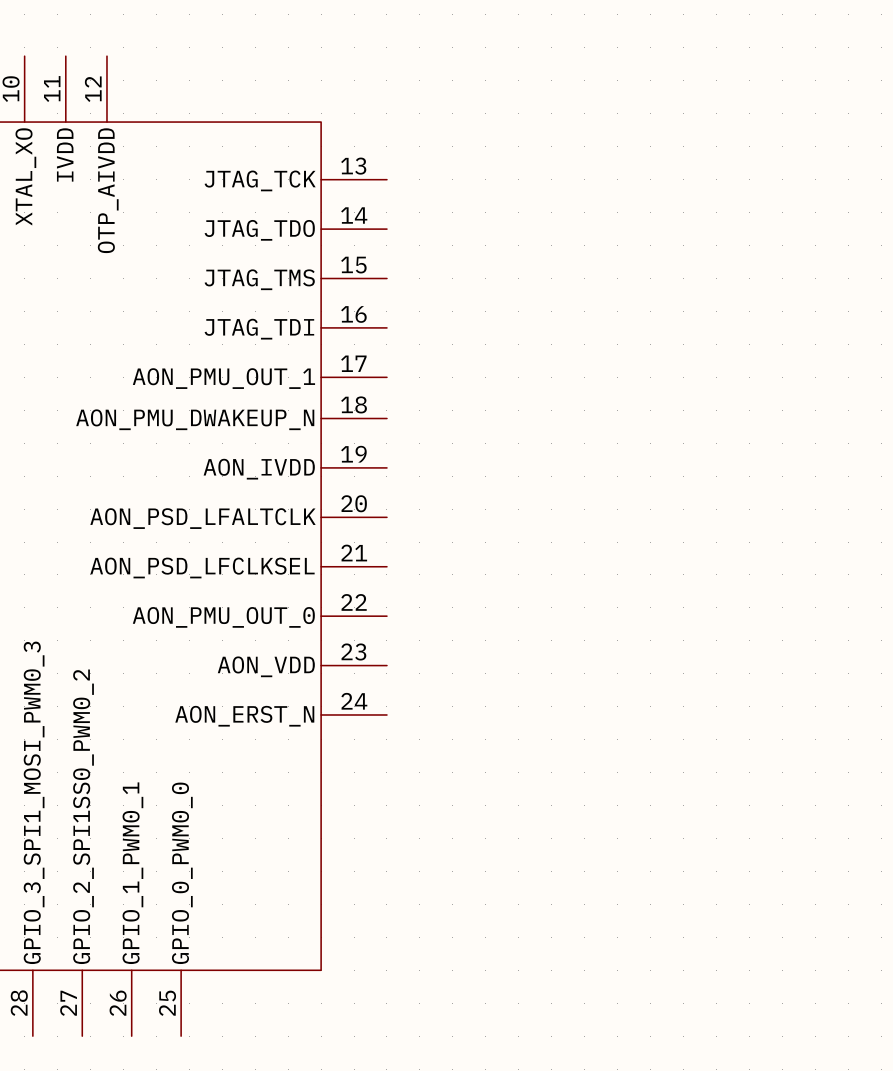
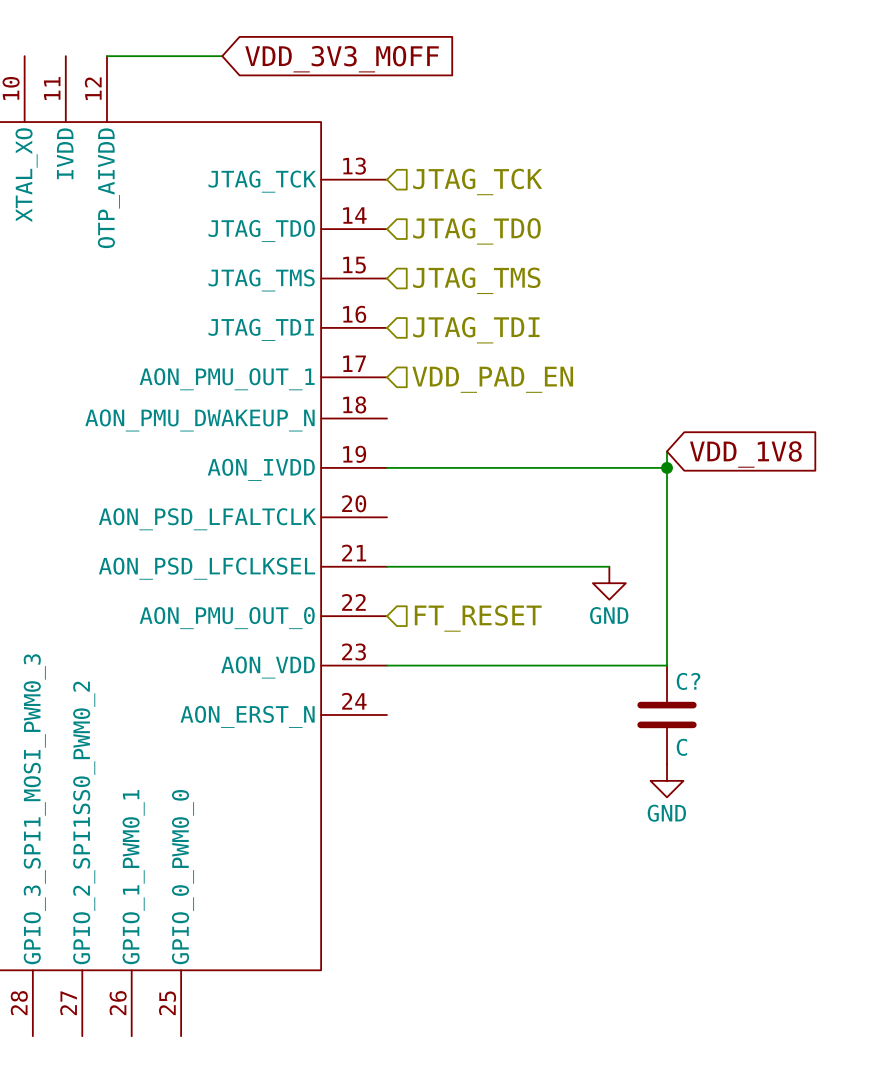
wire: none -> (106, 56) (222, 56)
global label: none -> VDD_3V3_MOFF (342, 59)
hierarchical label: none -> JTAG_TCK (477, 181)
hierarchical label: none -> JTAG_TDO (476, 231)
hierarchical label: none -> JTAG_TMS (476, 280)
hierarchical label: none -> JTAG_TDI (476, 330)
hierarchical label: none -> VDD_PAD_EN (492, 379)
wire: none -> (667, 451) (667, 665) (386, 665)
global label: none -> VDD_1V8 (745, 454)
wire: none -> (386, 467) (667, 467)
junction: none -> (667, 467)
wire: none -> (386, 566) (609, 566)
power symbol: none -> GND (609, 583)
hierarchical label: none -> FT_RESET (478, 618)
C?: none -> C (667, 714)
power symbol: none -> GND (667, 780)

